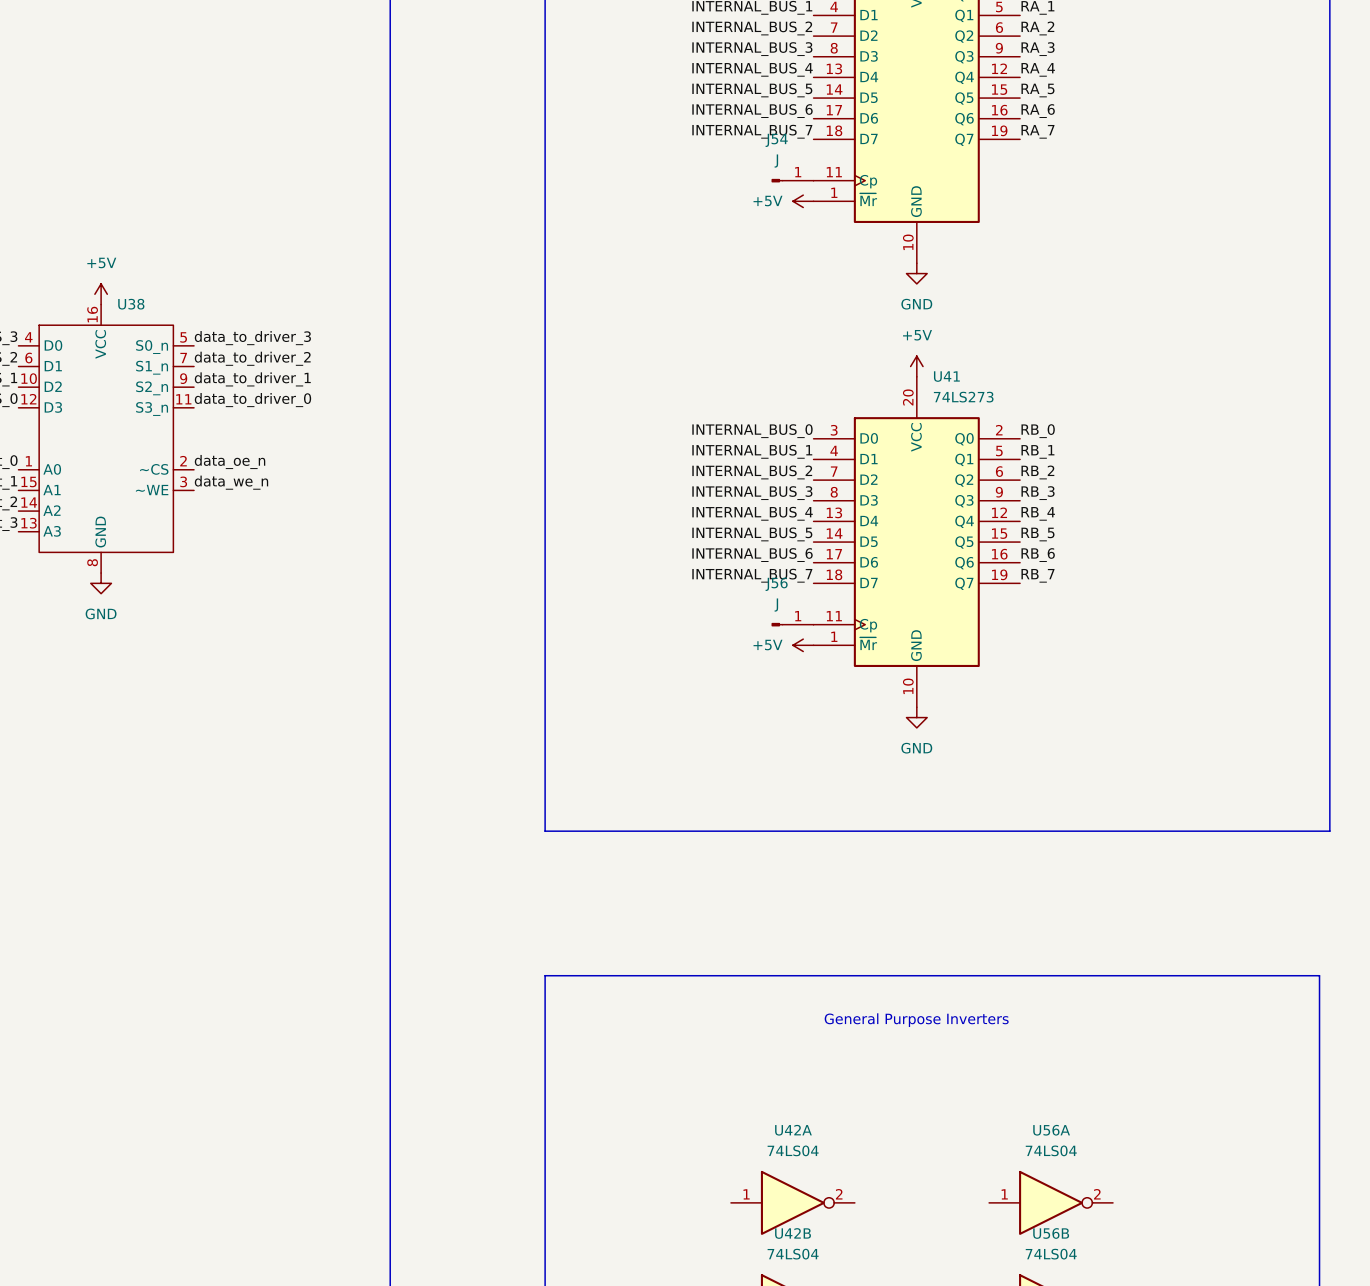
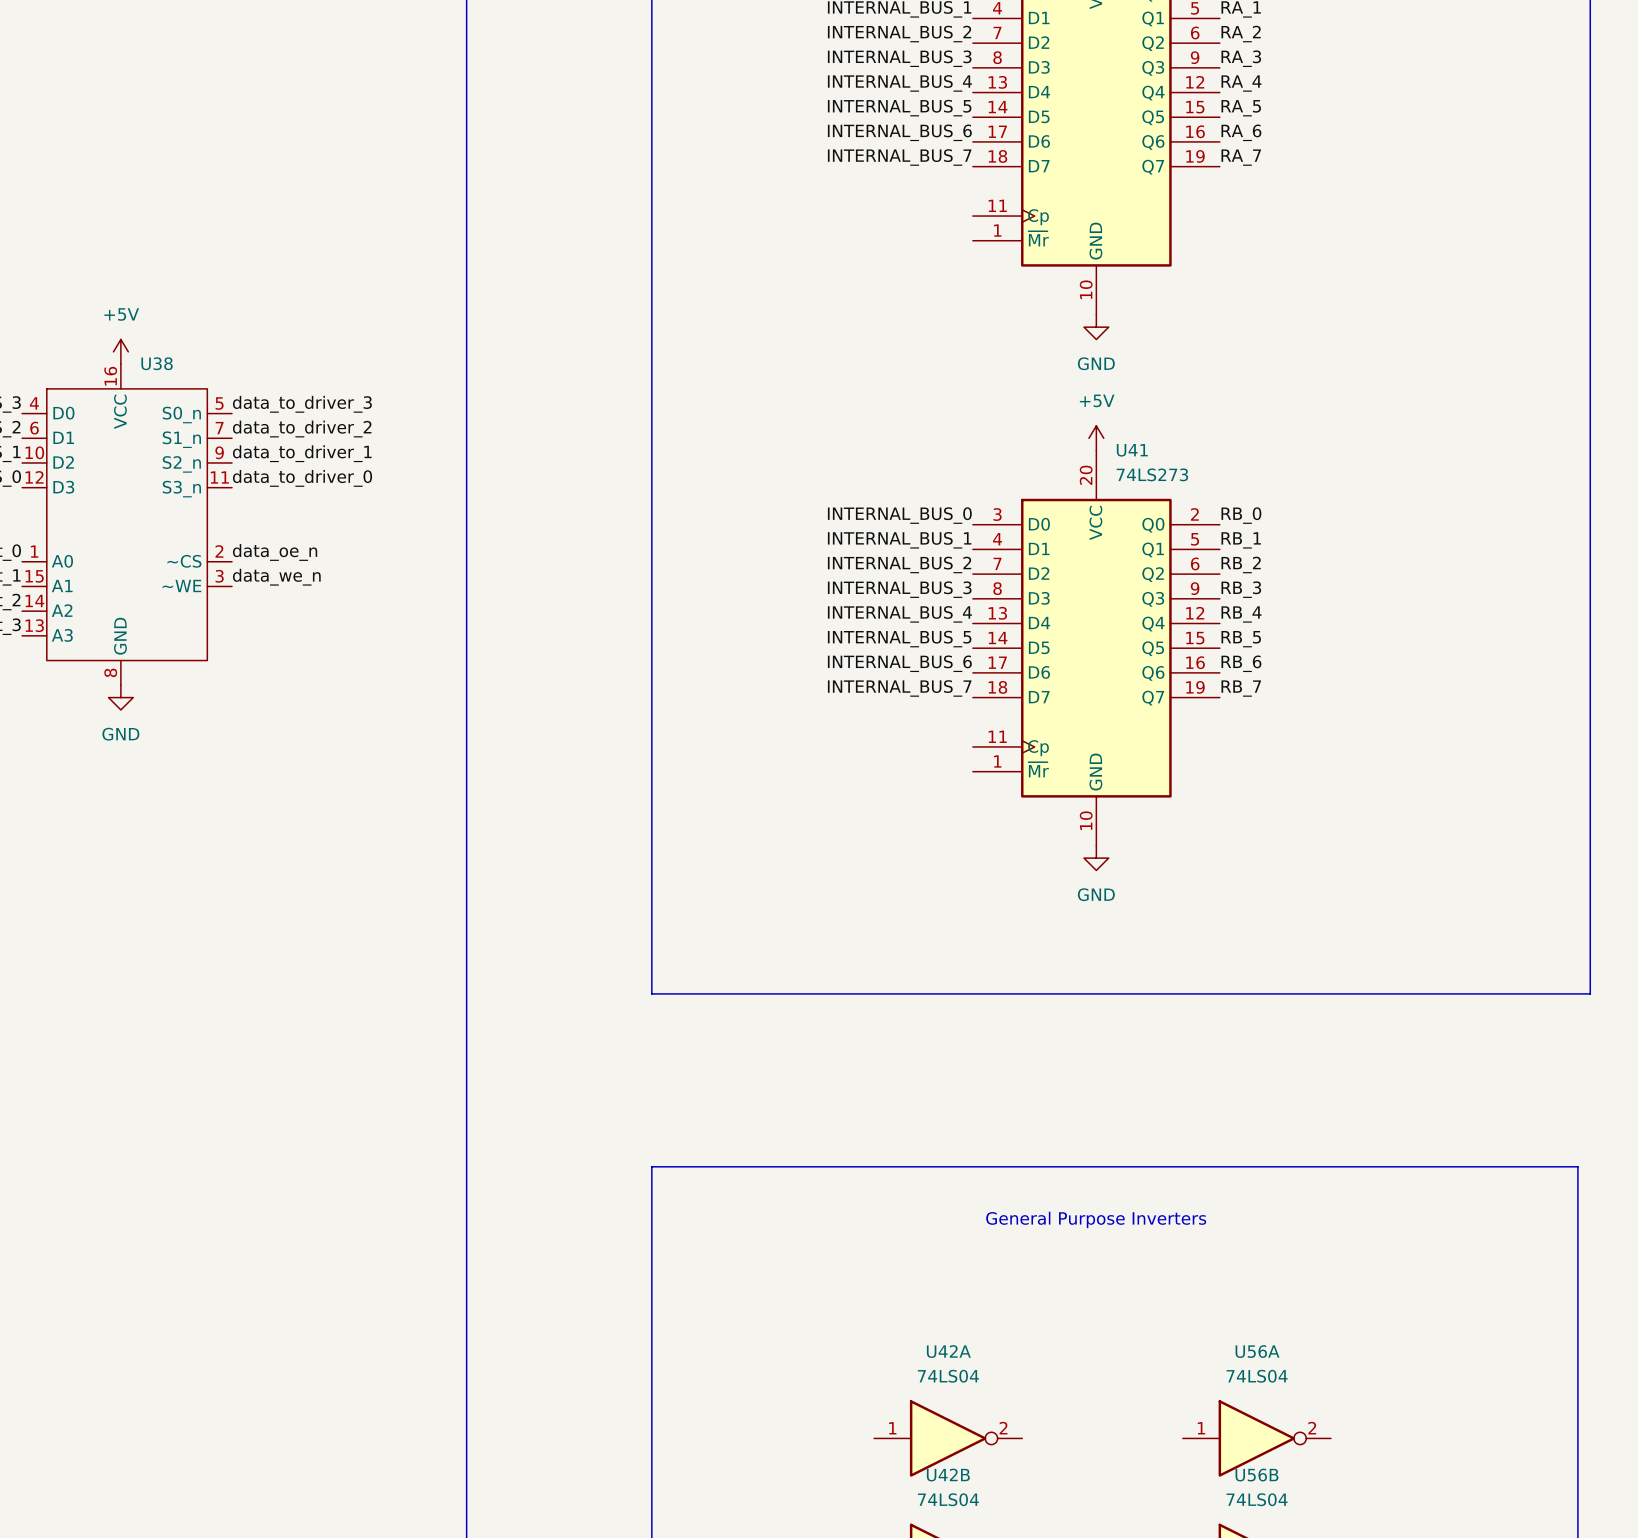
J54: J (792, 180) -> none
power symbol: +5V (803, 201) -> none
J56: J (792, 624) -> none
power symbol: +5V (803, 645) -> none

